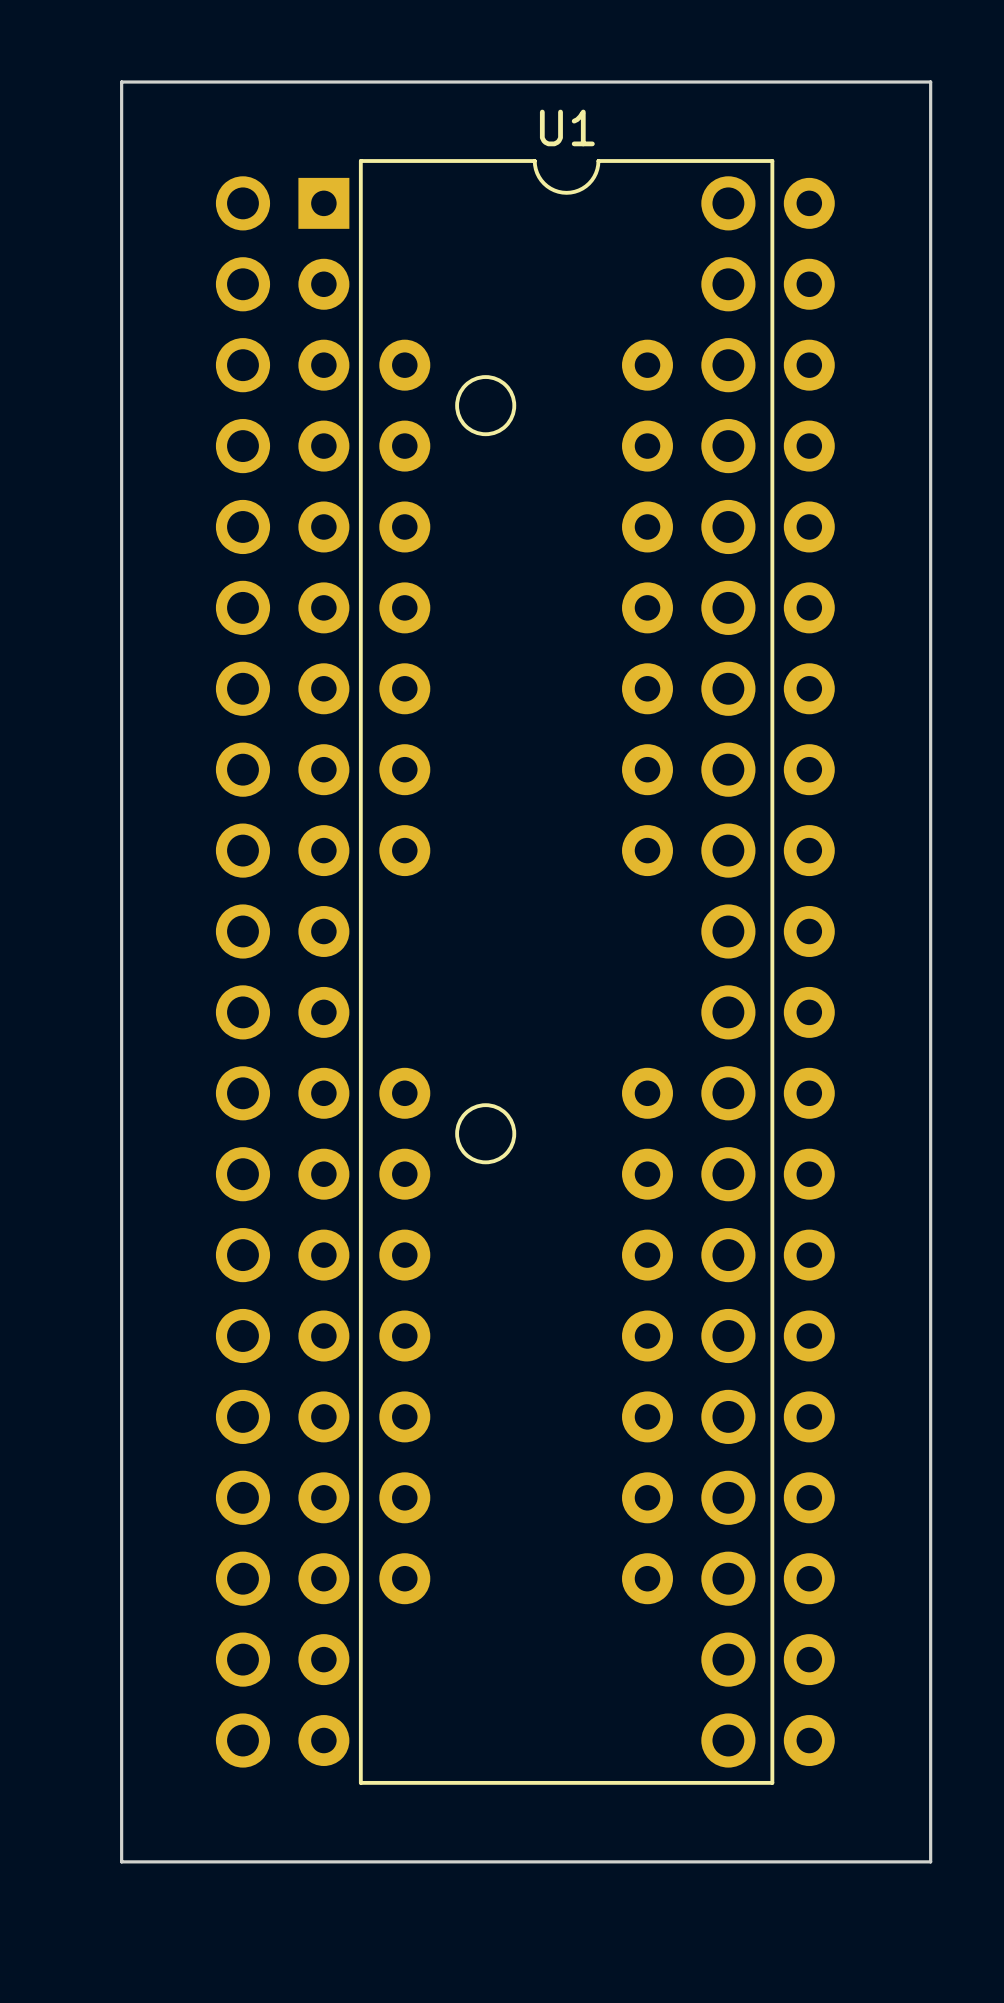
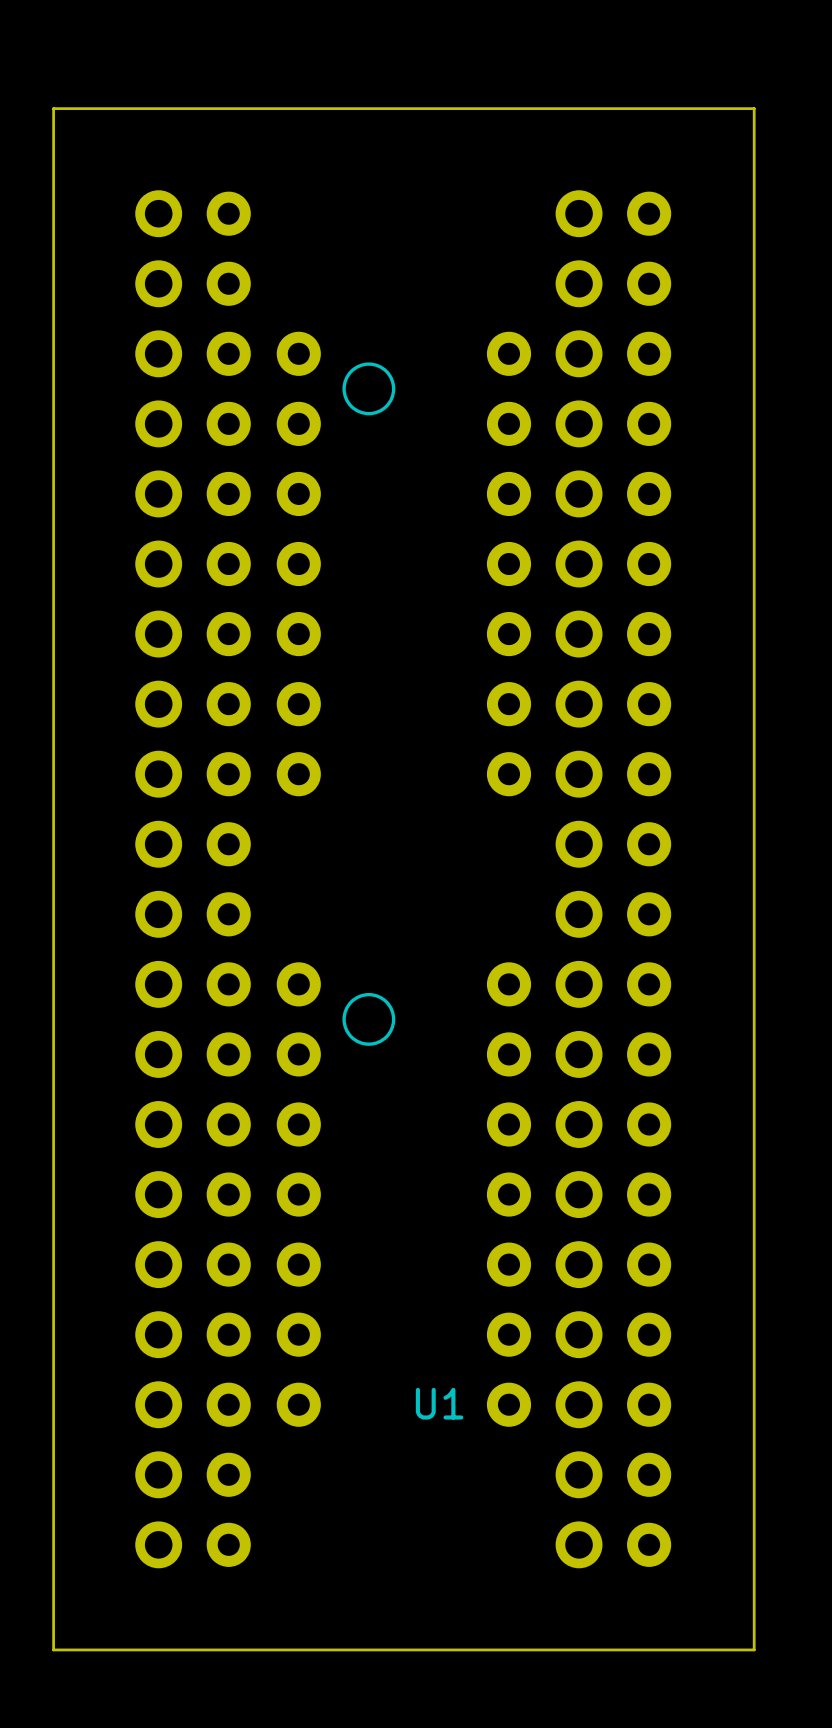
U1 name position: U1 (567, 127) -> U1 (439, 1403)
U1 footprint: [298, 159, 835, 1785] -> [206, 191, 672, 1567]

